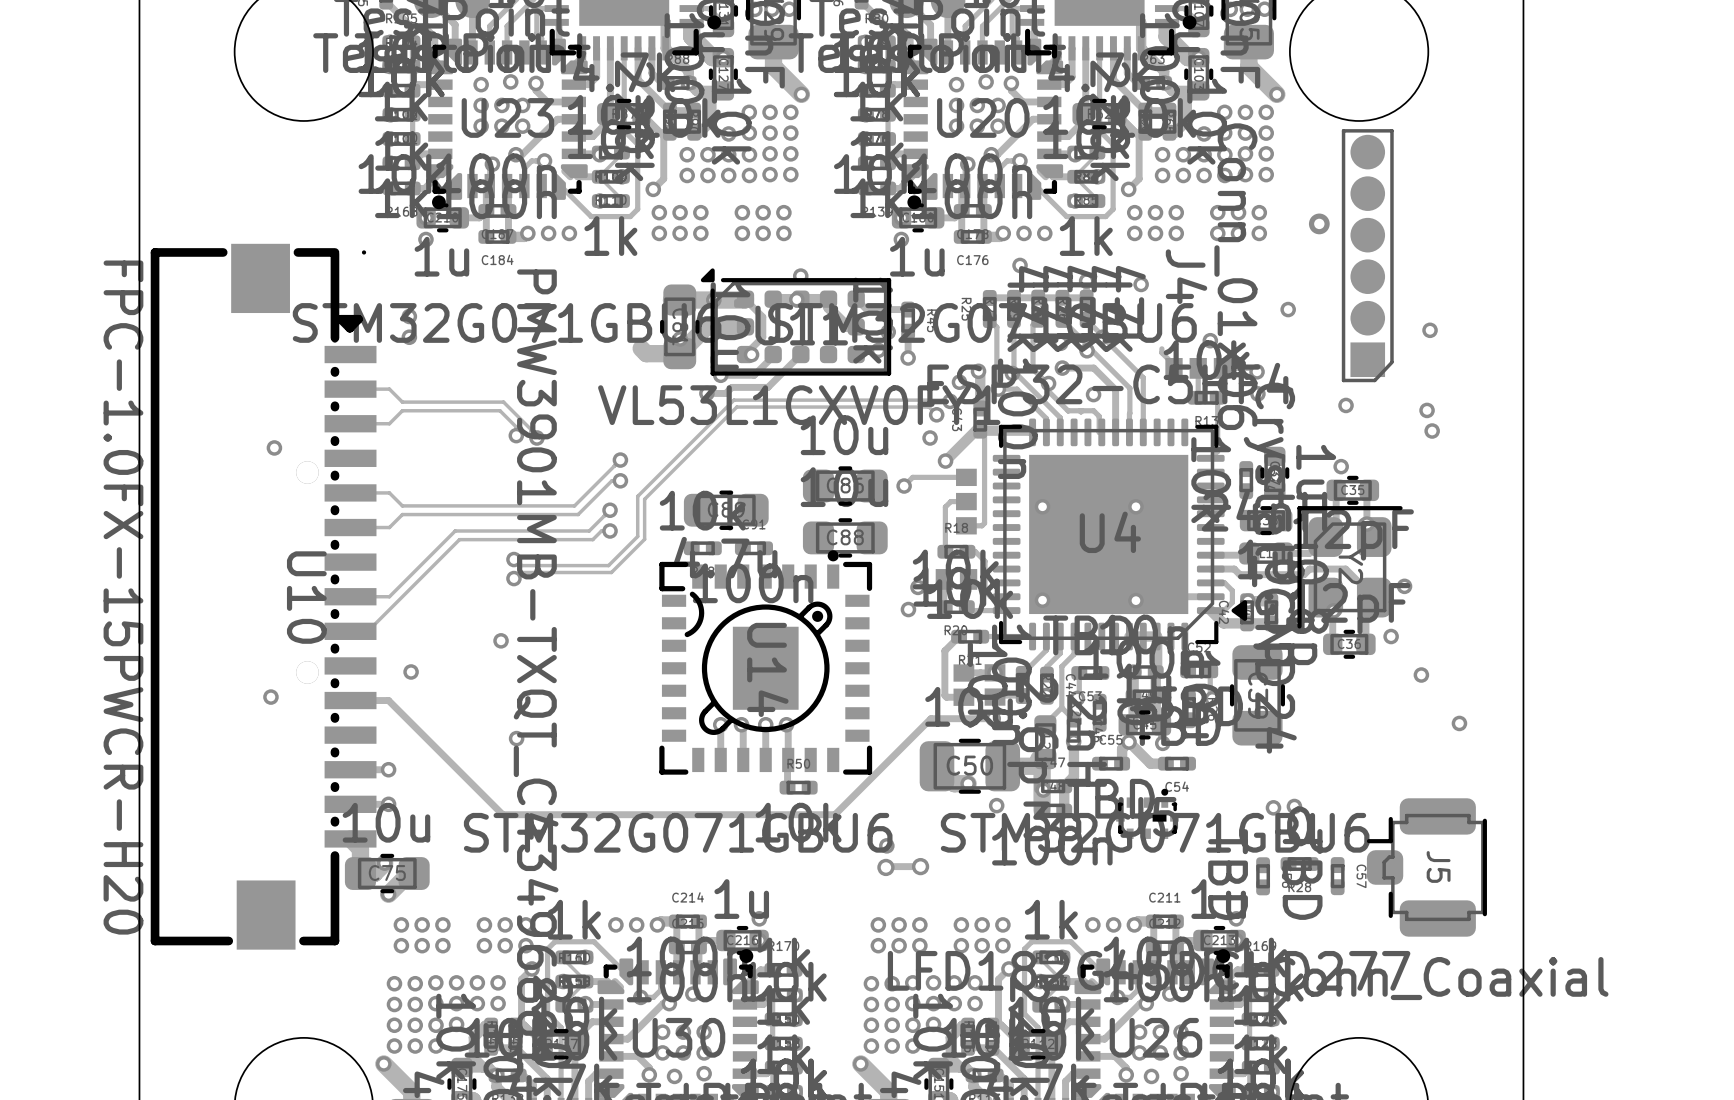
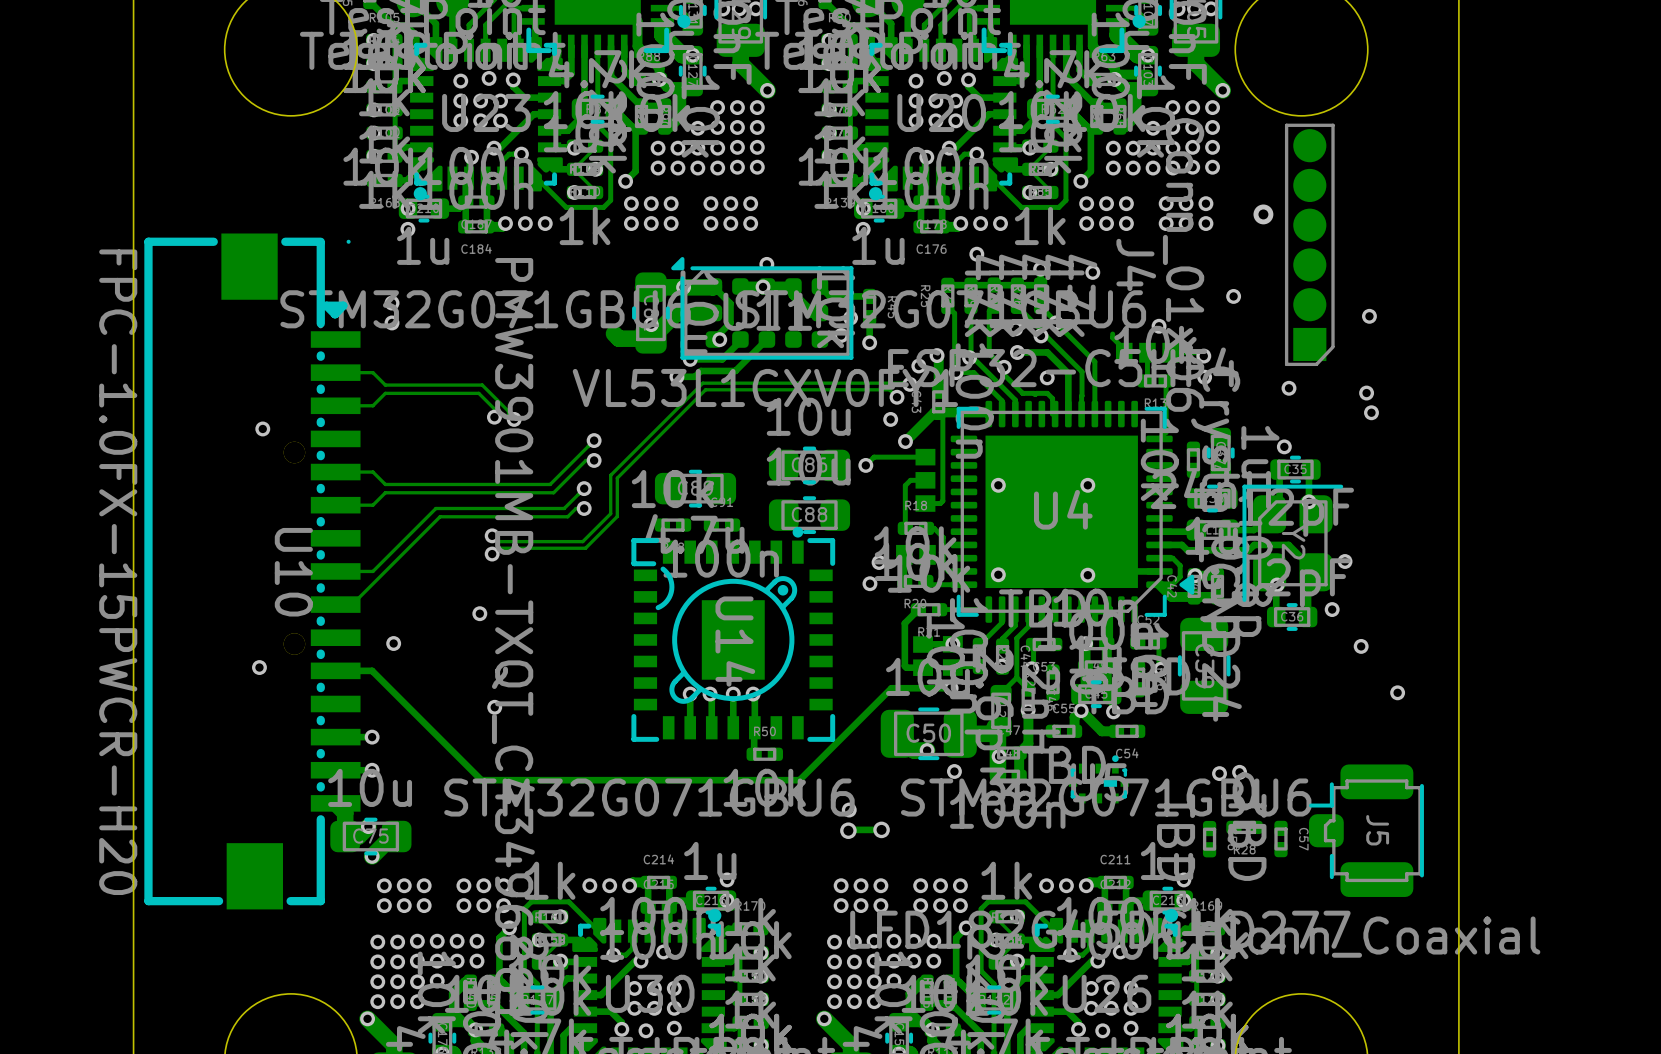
track: none -> (1147, 74) (1119, 74) (1114, 79)

